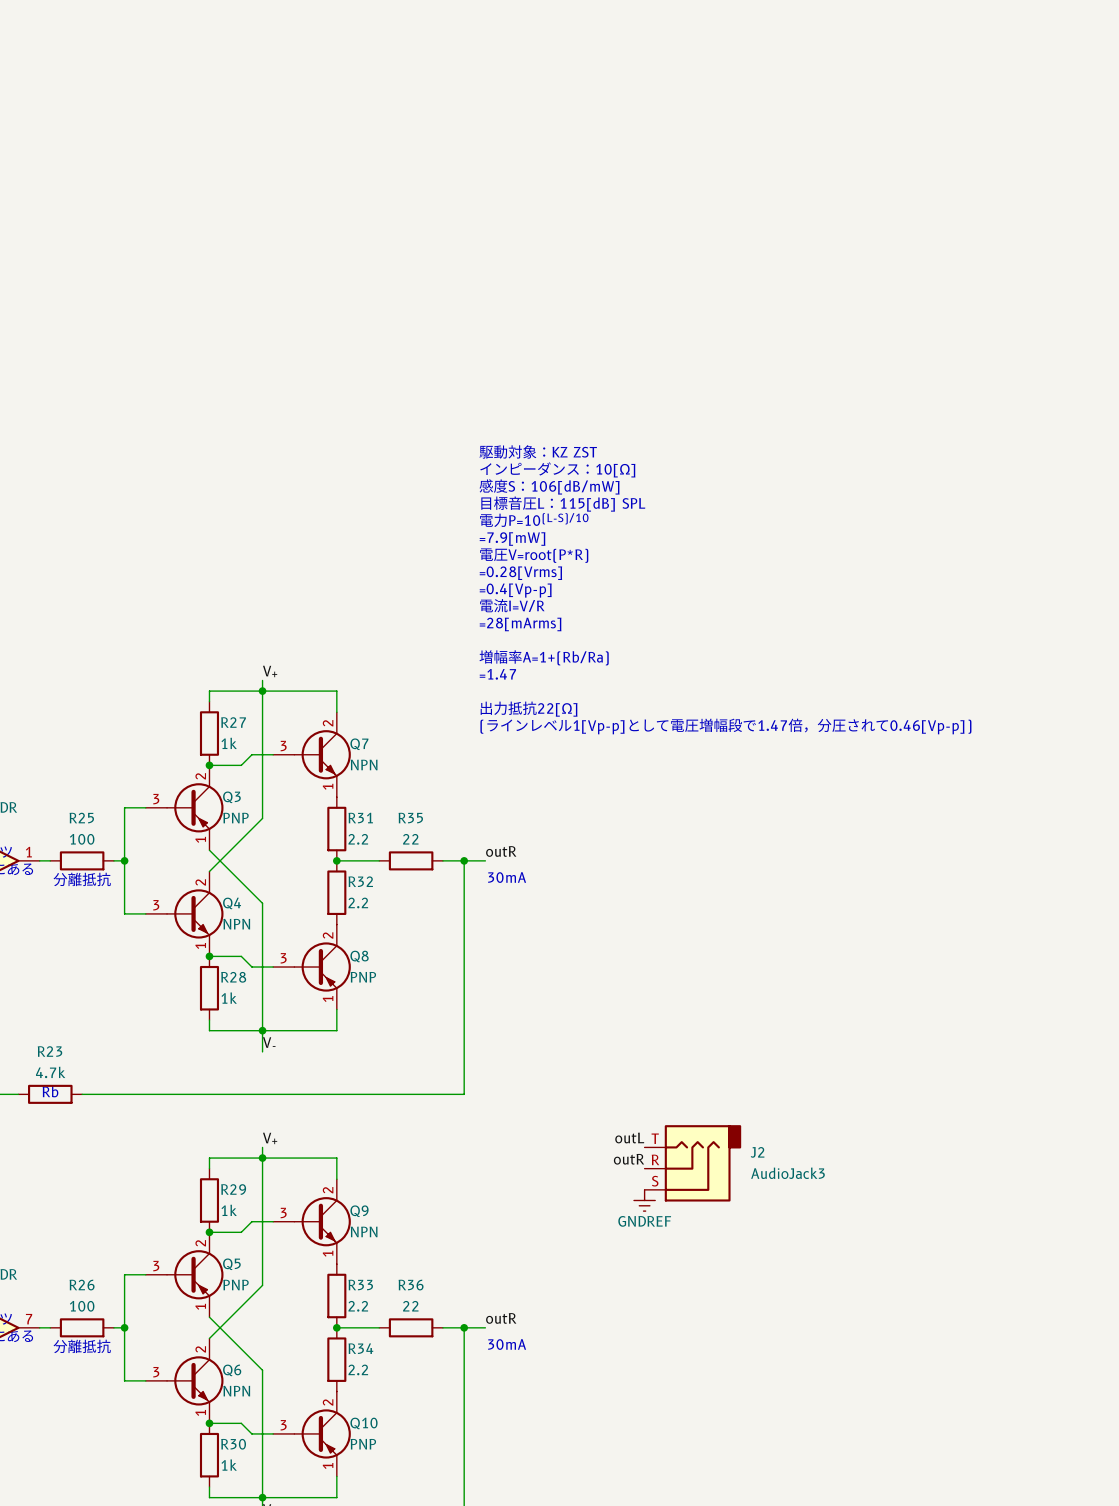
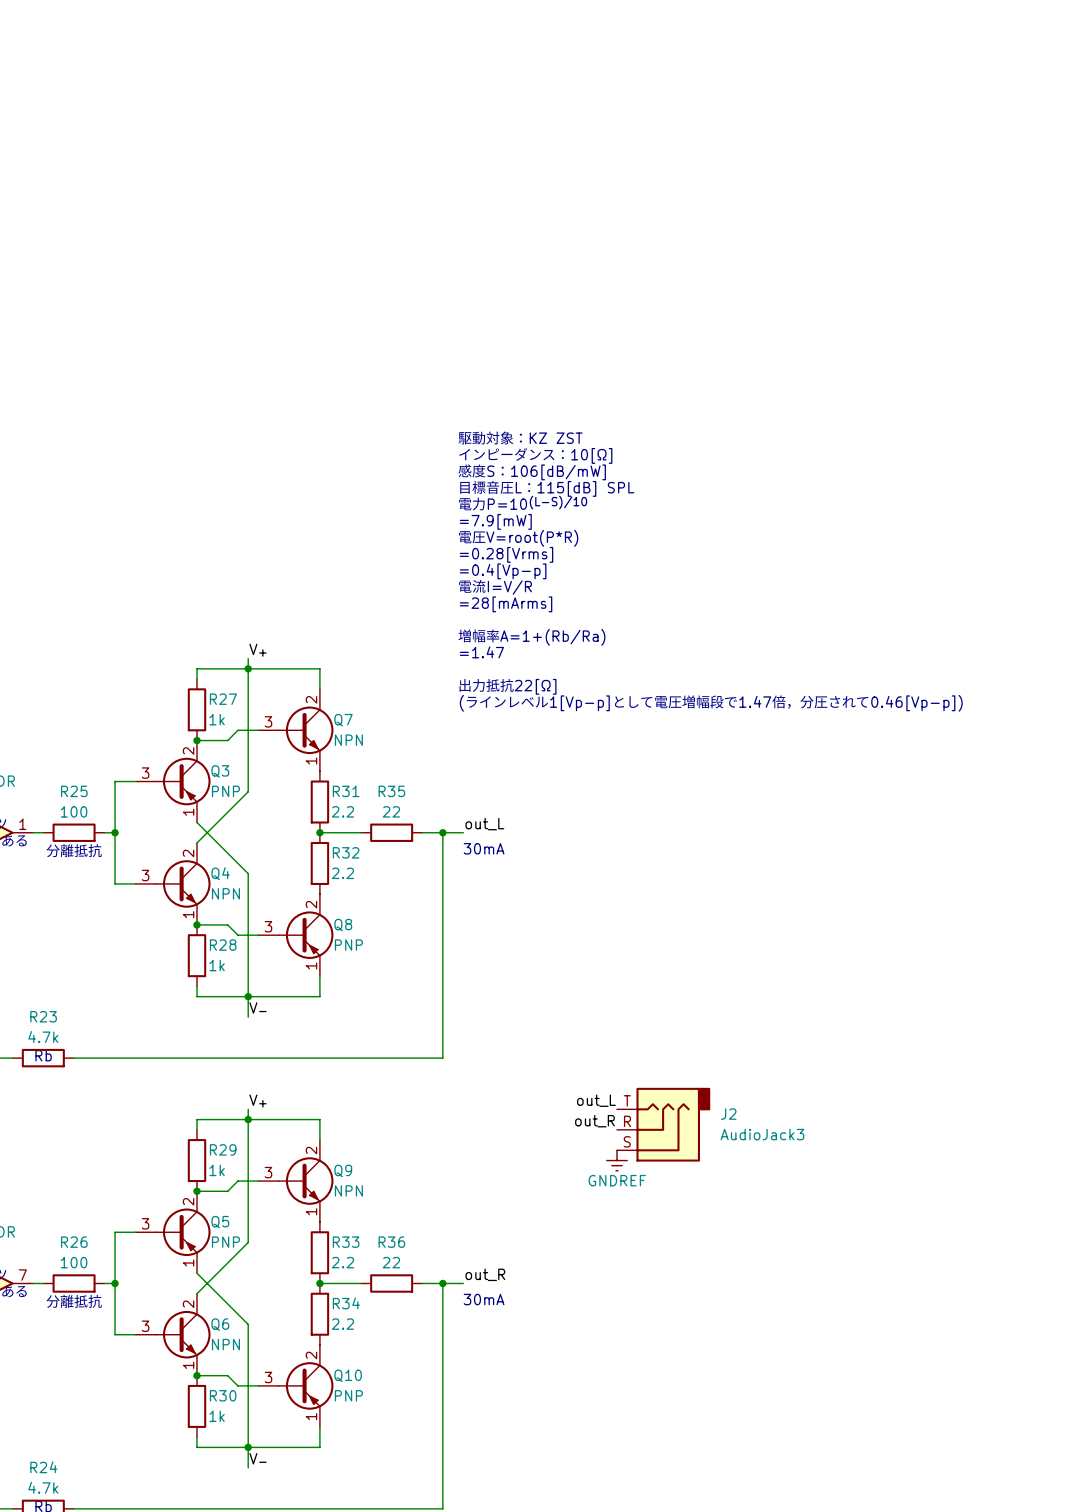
label: outR (501, 851) -> out_L (484, 824)
label: outL (629, 1138) -> out_L (596, 1100)
label: outR (629, 1159) -> out_R (594, 1121)
label: outR (501, 1318) -> out_R (485, 1274)

